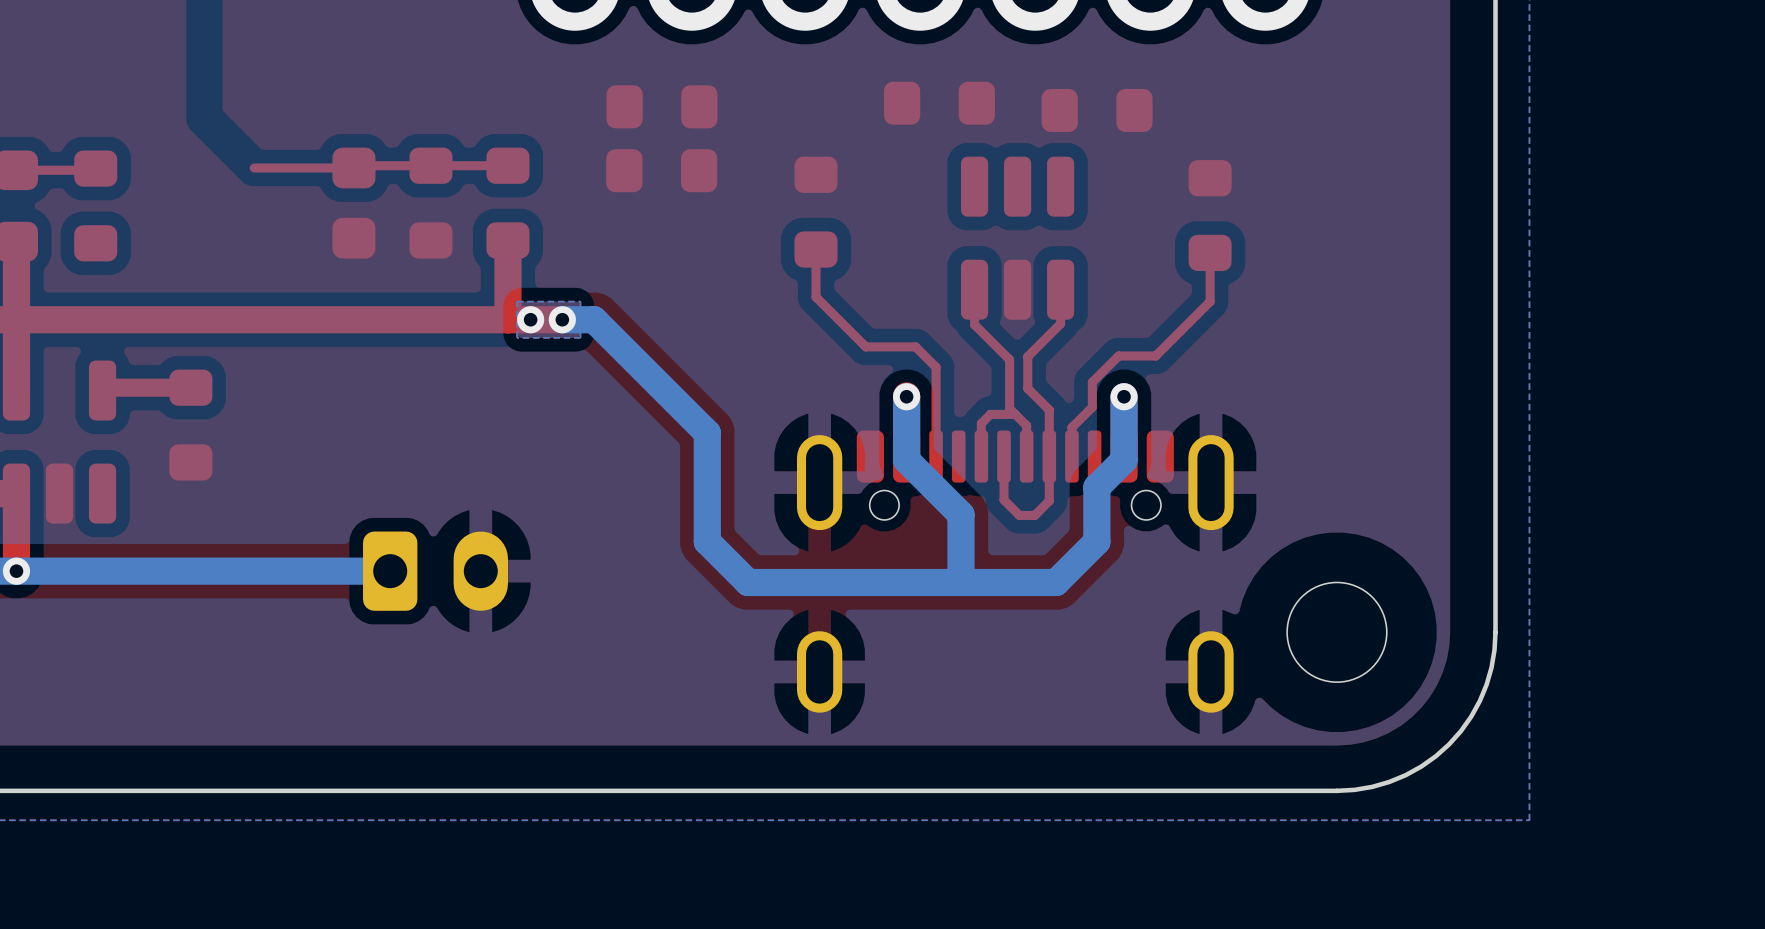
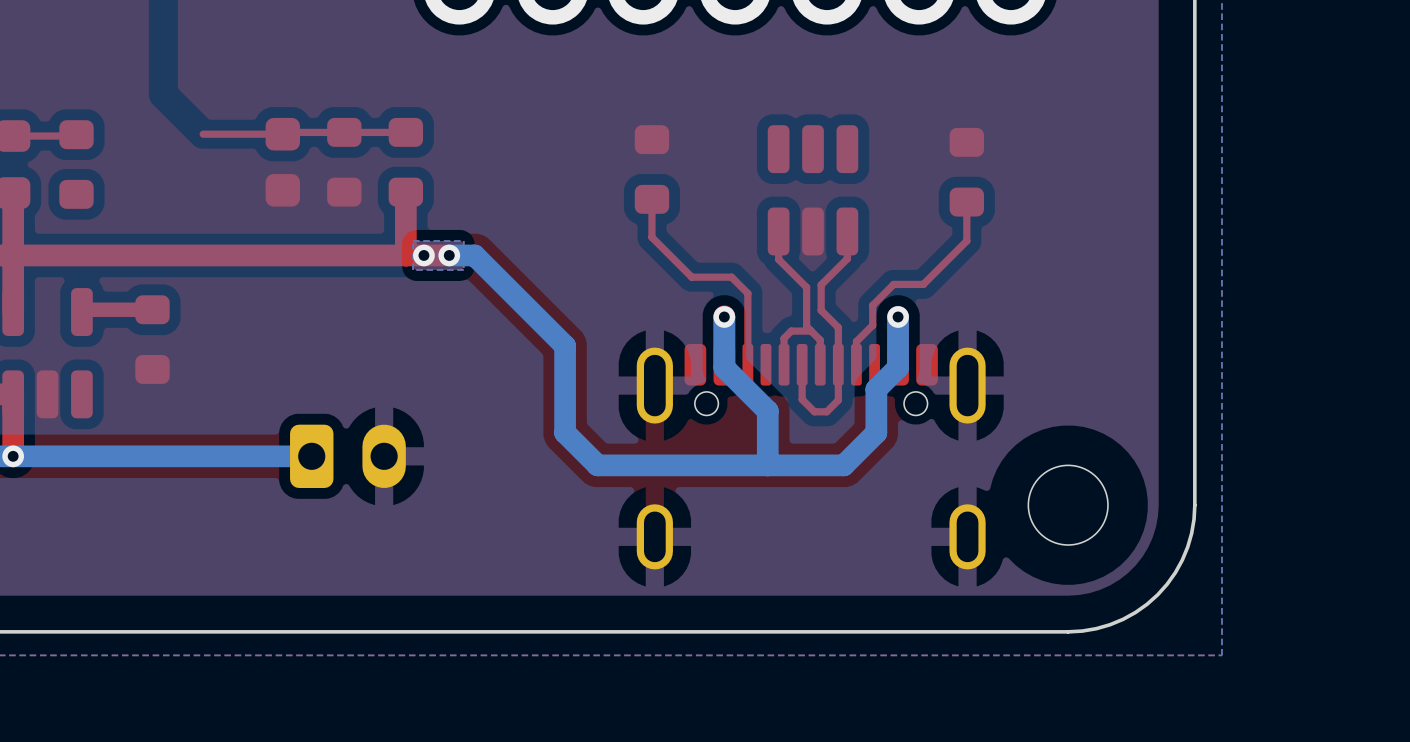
part: (939, 103) -> none
part: (661, 106) -> none
part: (1097, 110) -> none
part: (661, 170) -> none

